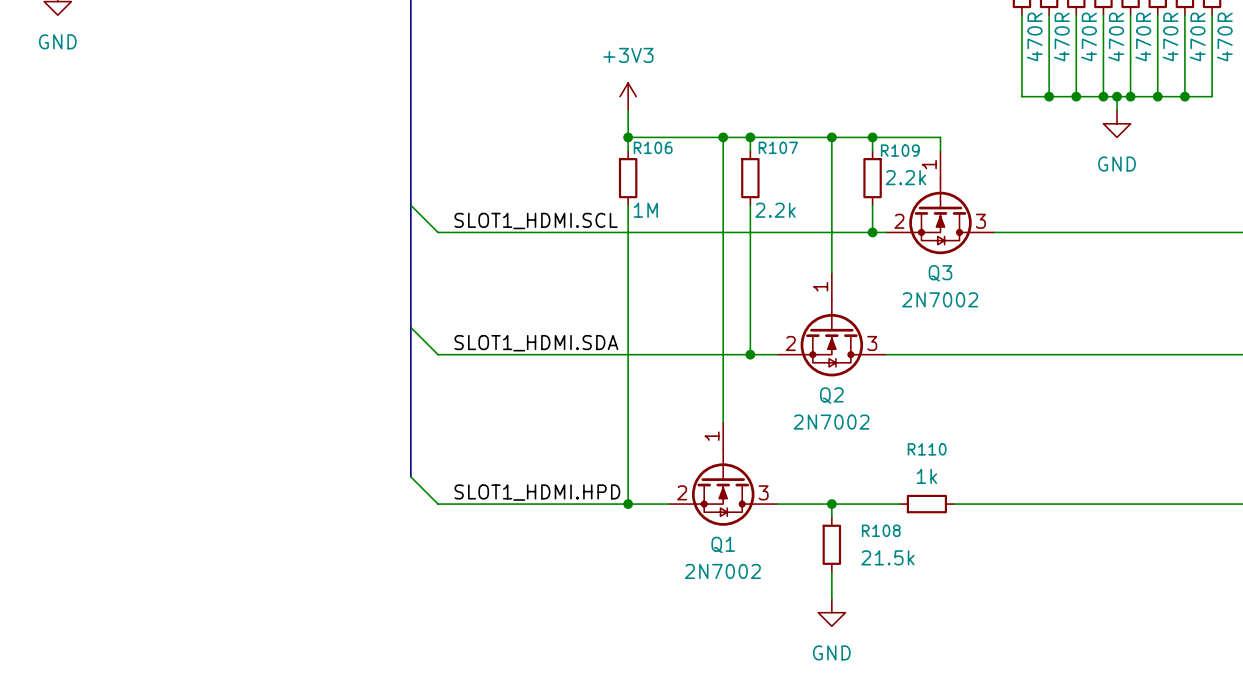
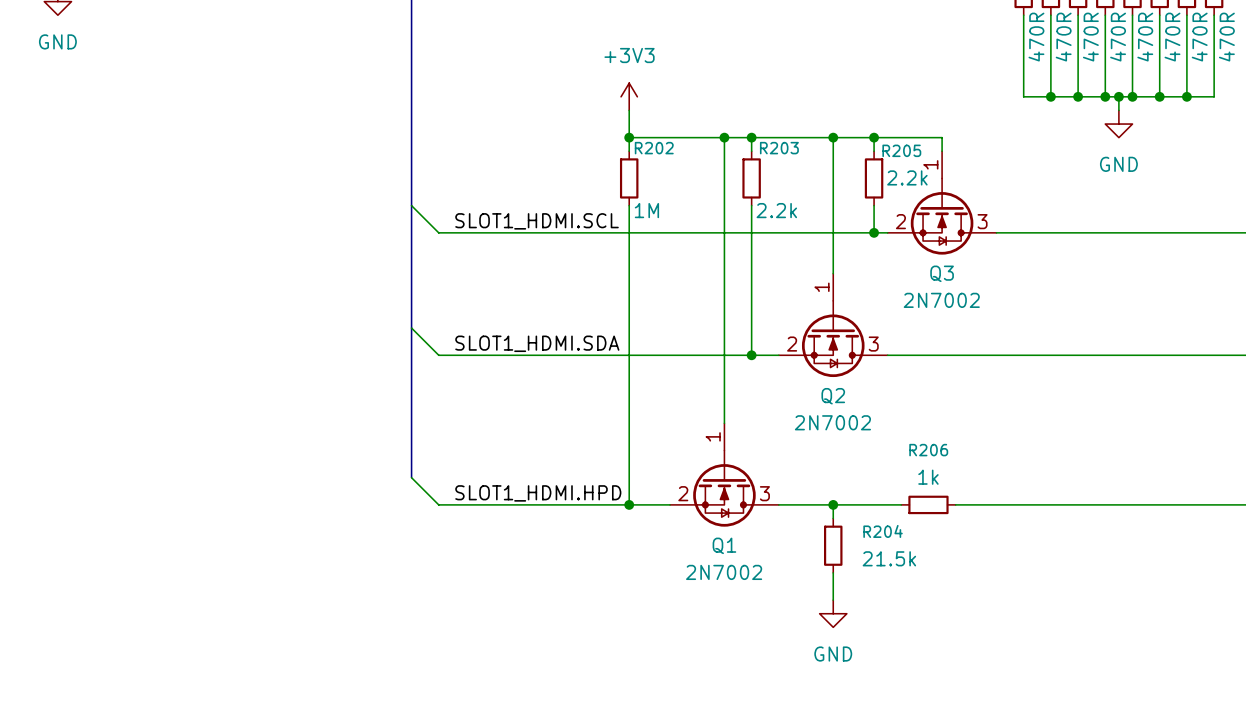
R106 name: R106 (653, 147) -> R202 (654, 148)
R107 name: R107 (778, 147) -> R203 (779, 148)
R109 name: R109 (900, 150) -> R205 (901, 150)
R110 name: R110 (927, 449) -> R206 (928, 450)
R108 name: R108 (881, 530) -> R204 (883, 531)

